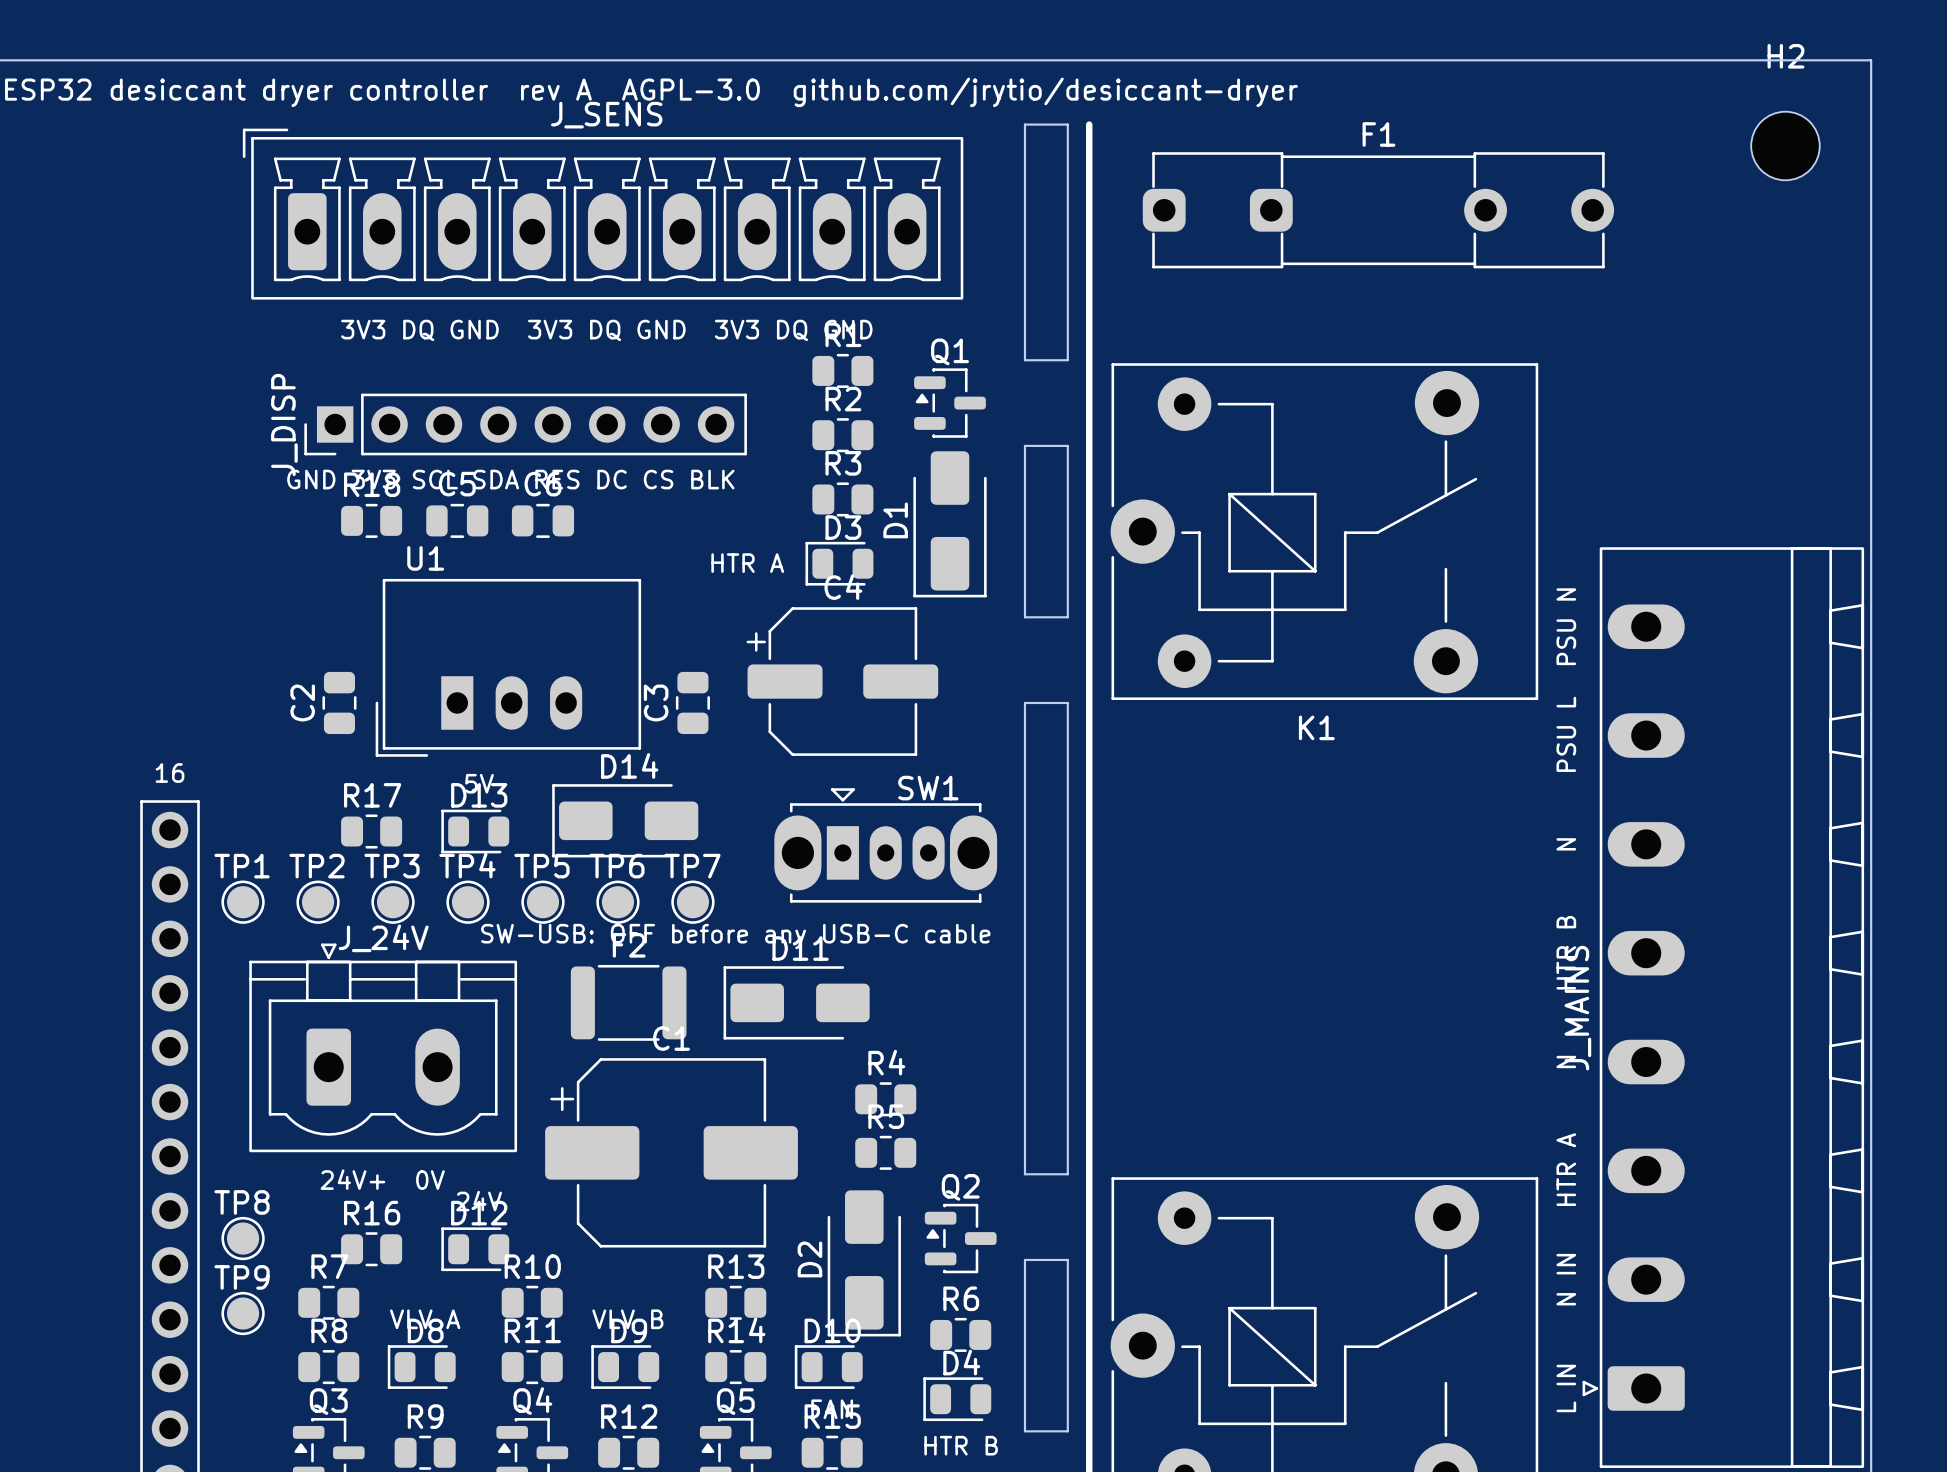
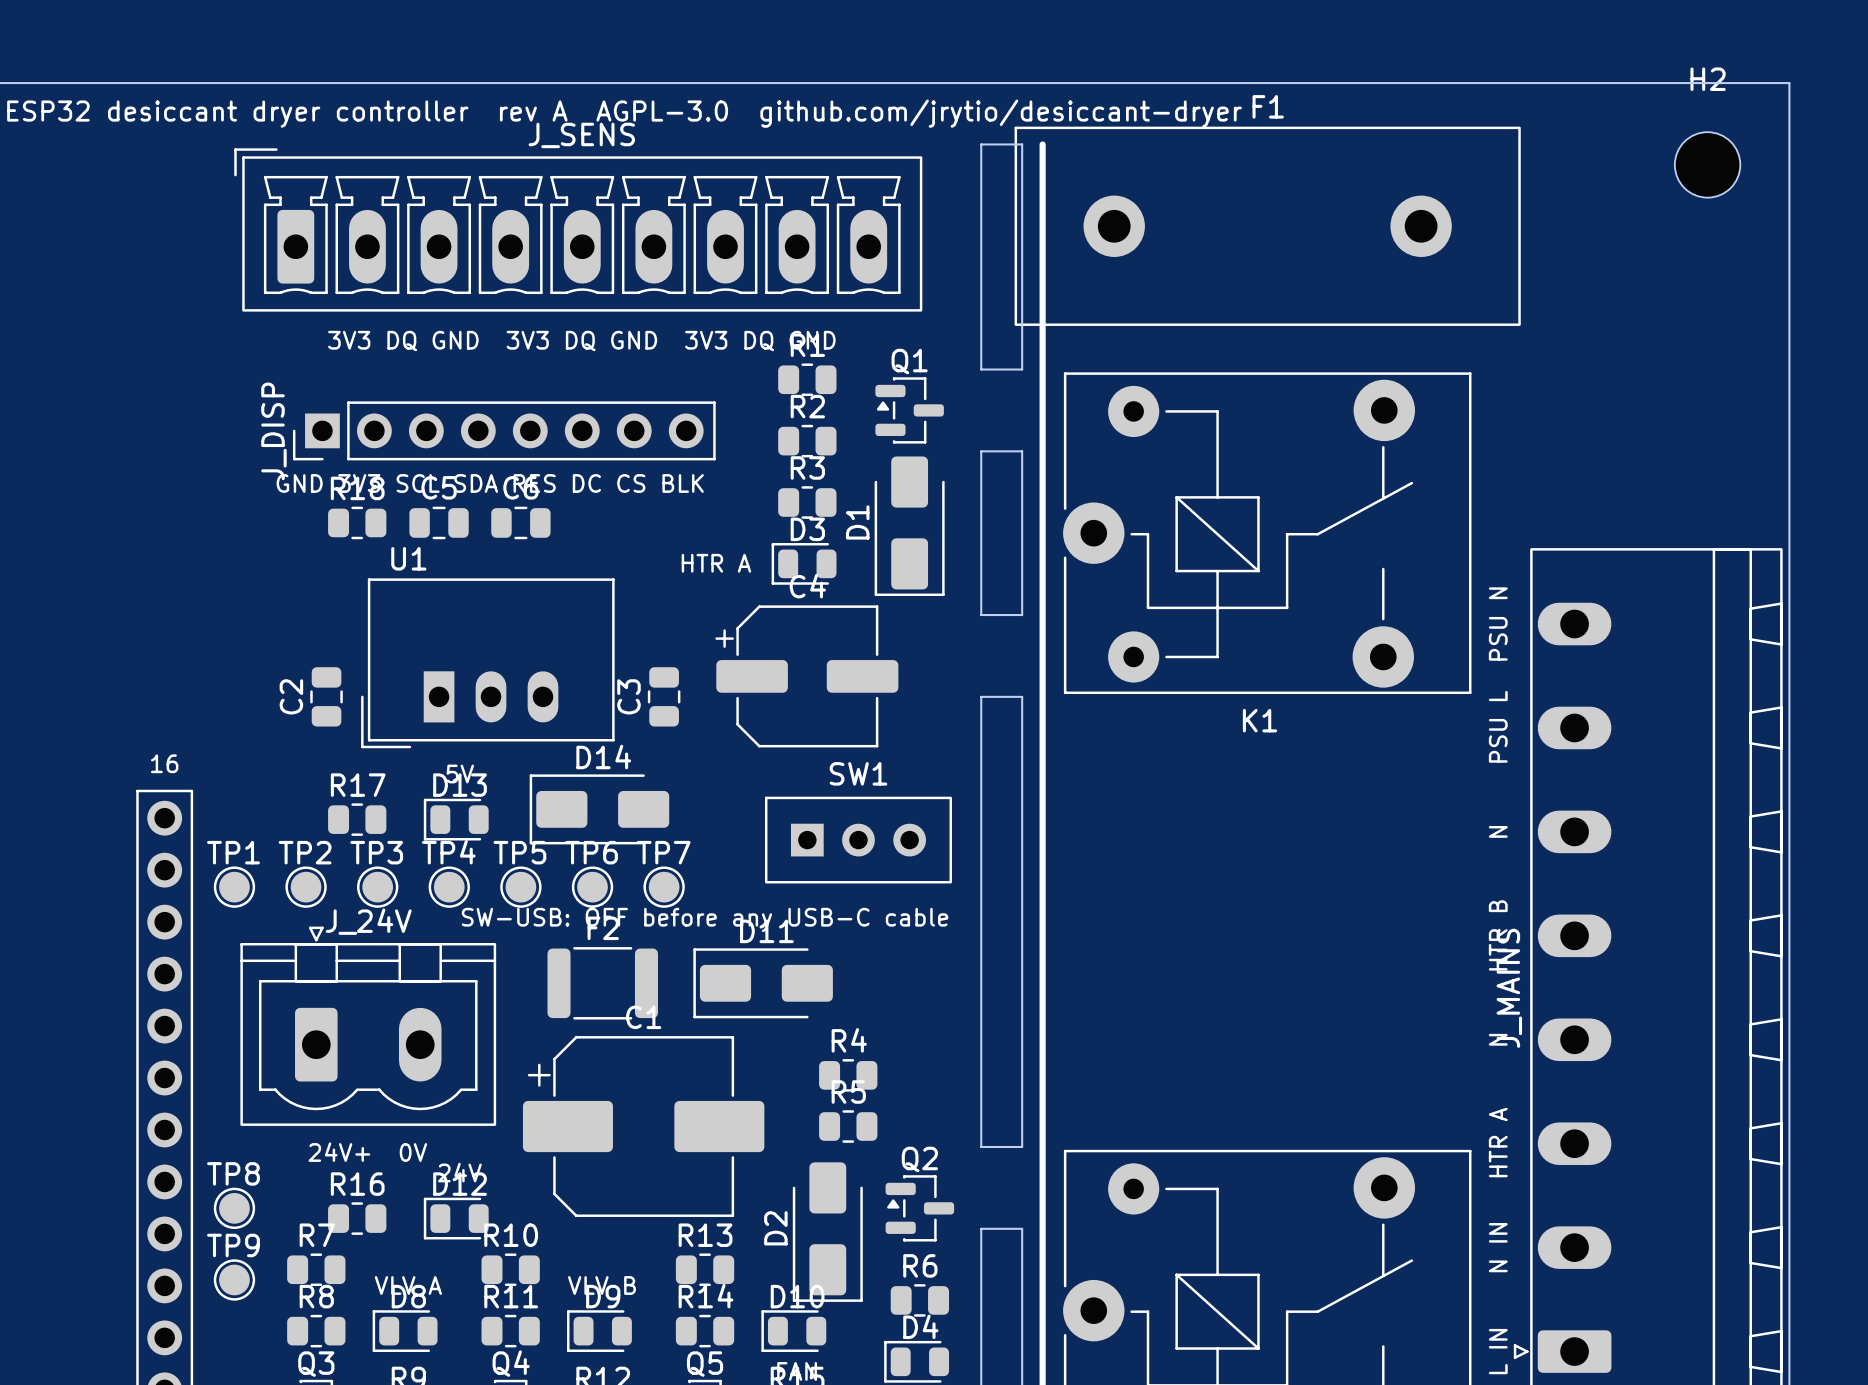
F1 name position: F1 (1378, 134) -> F1 (1268, 106)
F1 footprint: [1142, 152, 1615, 269] -> [1014, 126, 1521, 326]
SW1 footprint: [774, 788, 998, 903] -> [764, 796, 952, 884]
SW1 name position: SW1 (928, 788) -> SW1 (858, 773)

